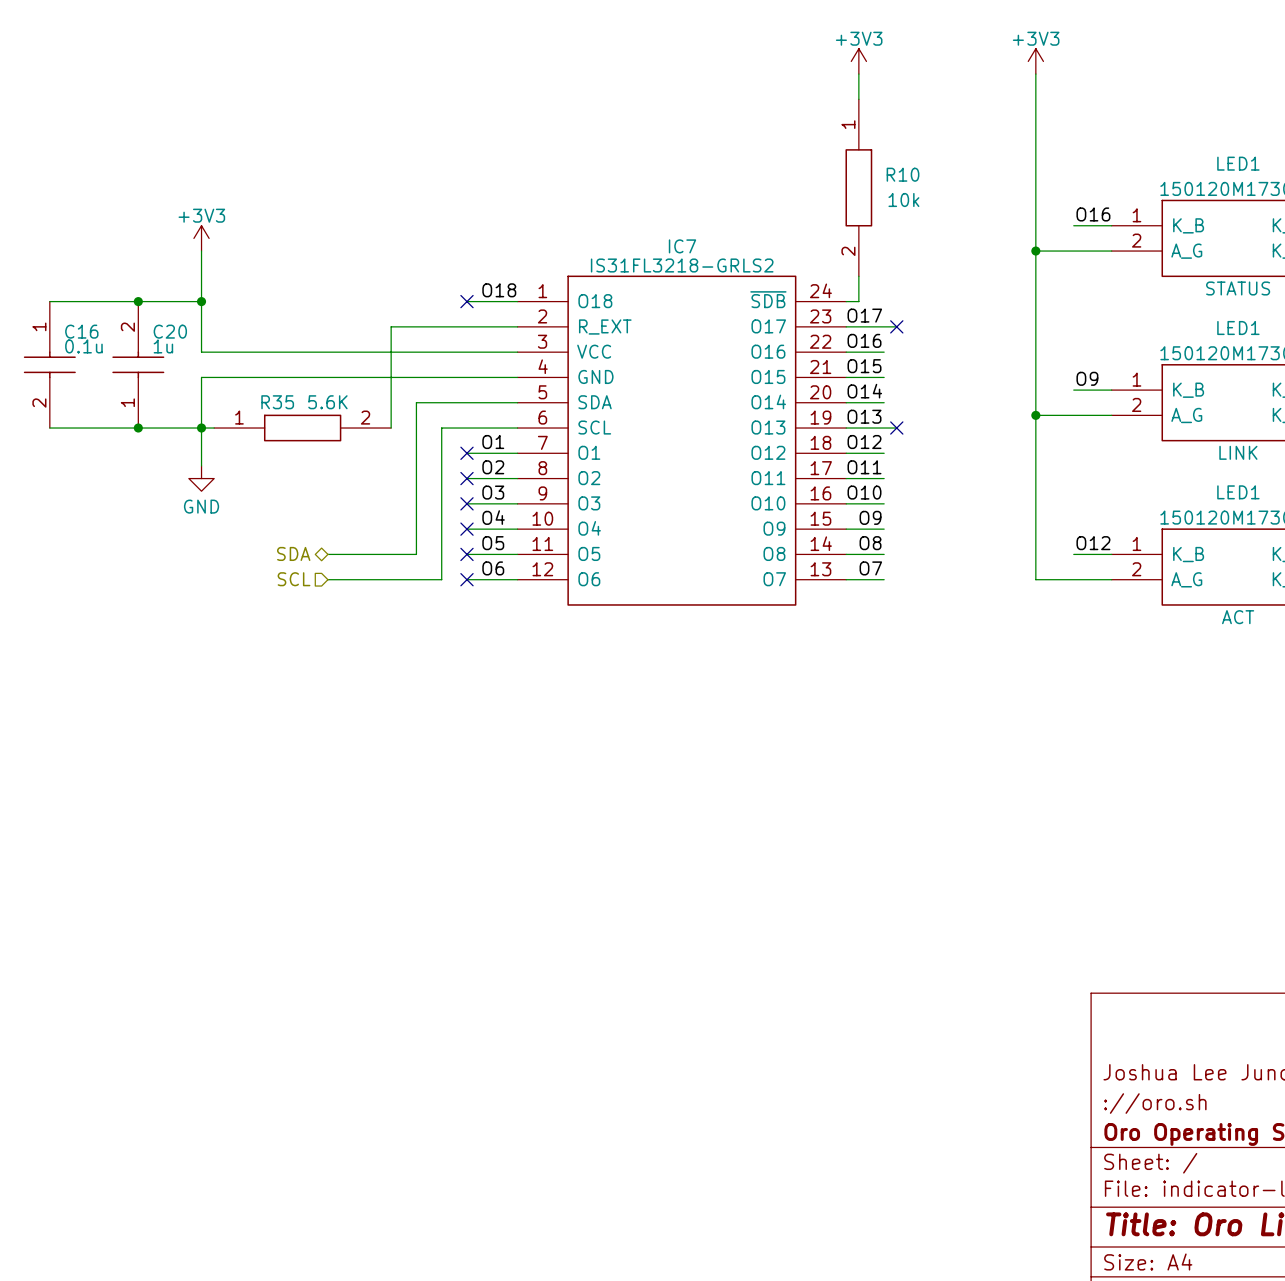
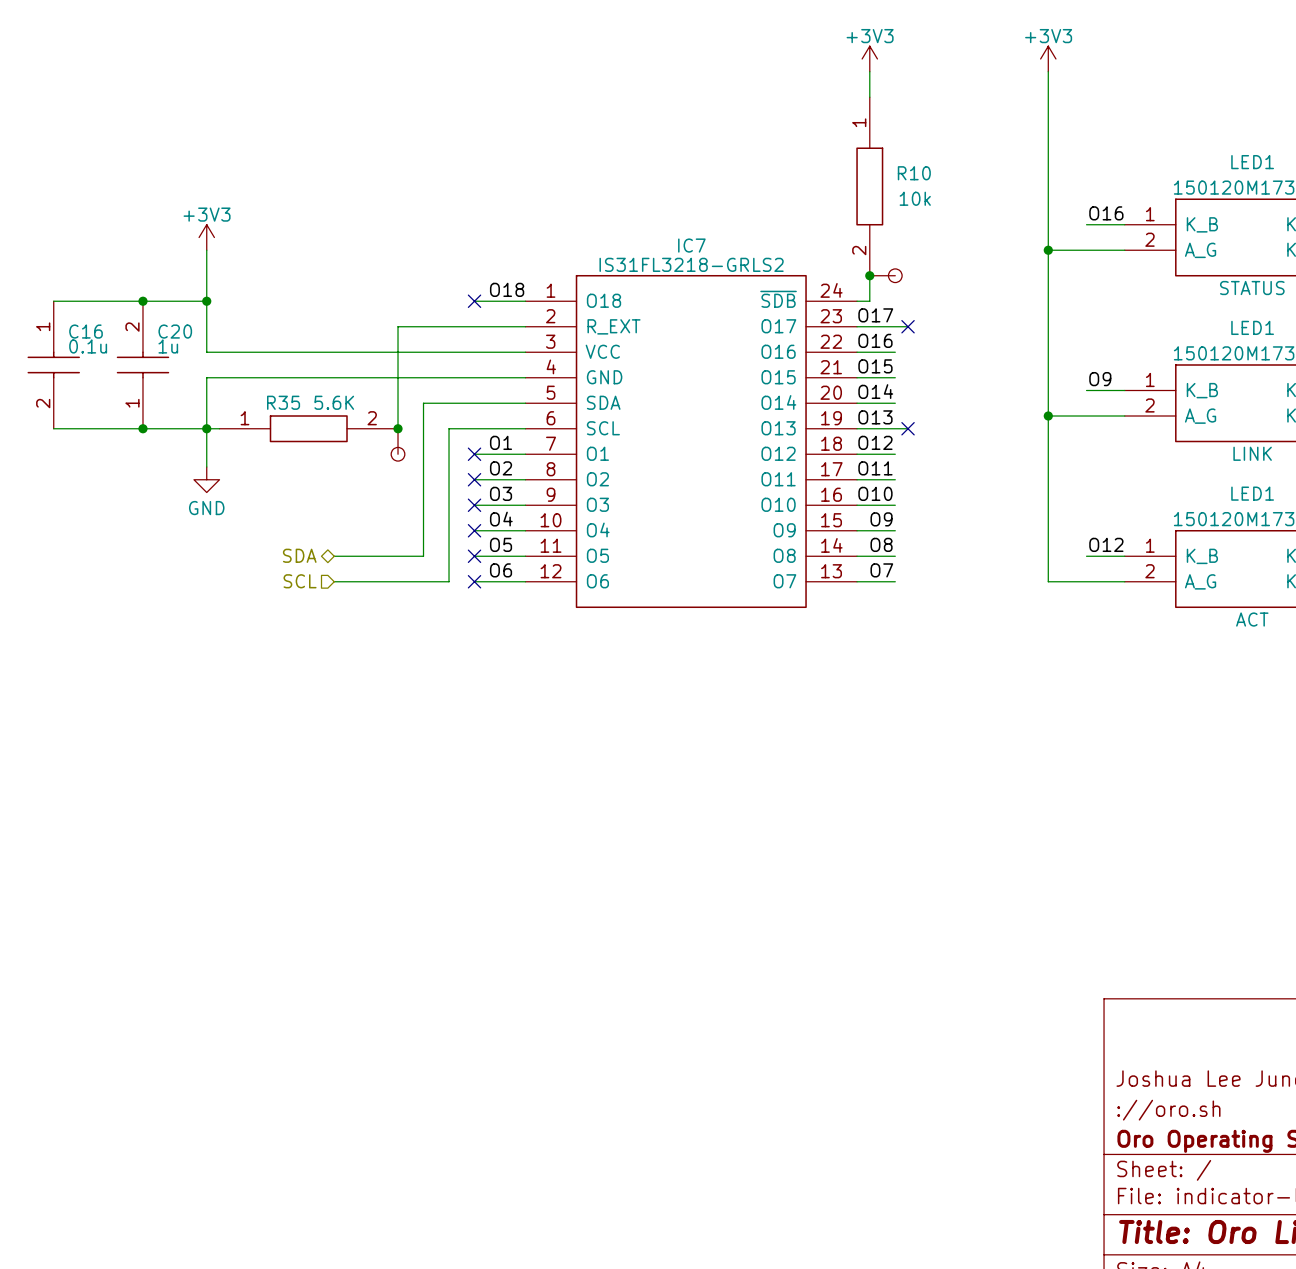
junction: none -> (869, 275)
part: none -> (885, 275)
junction: none -> (398, 428)
part: none -> (398, 444)

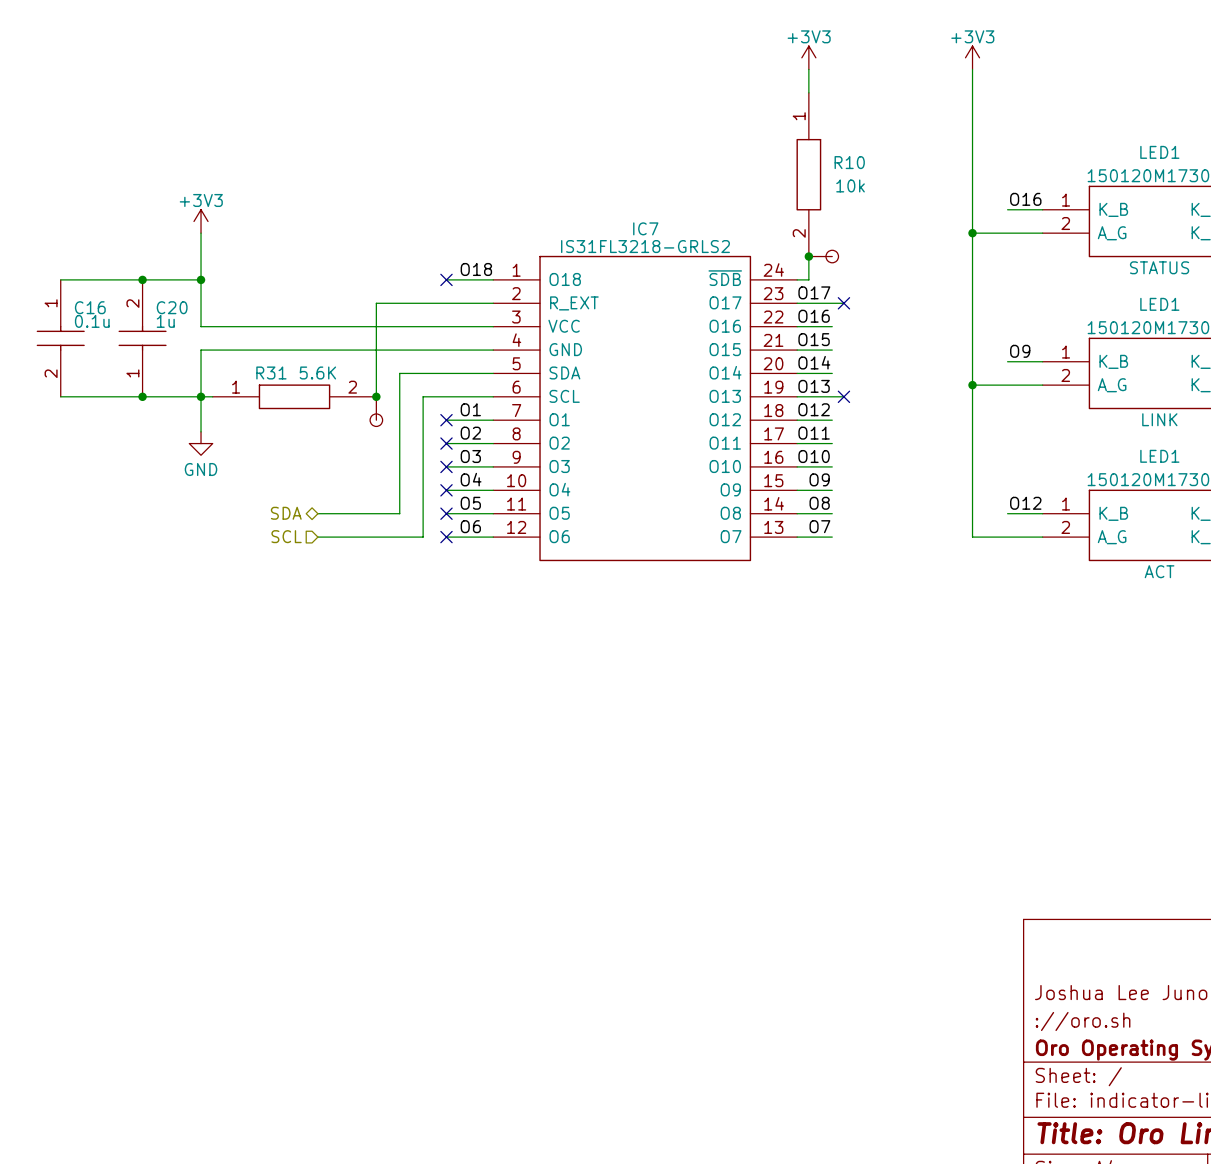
R35 name: R35 (283, 402) -> R31 (271, 372)

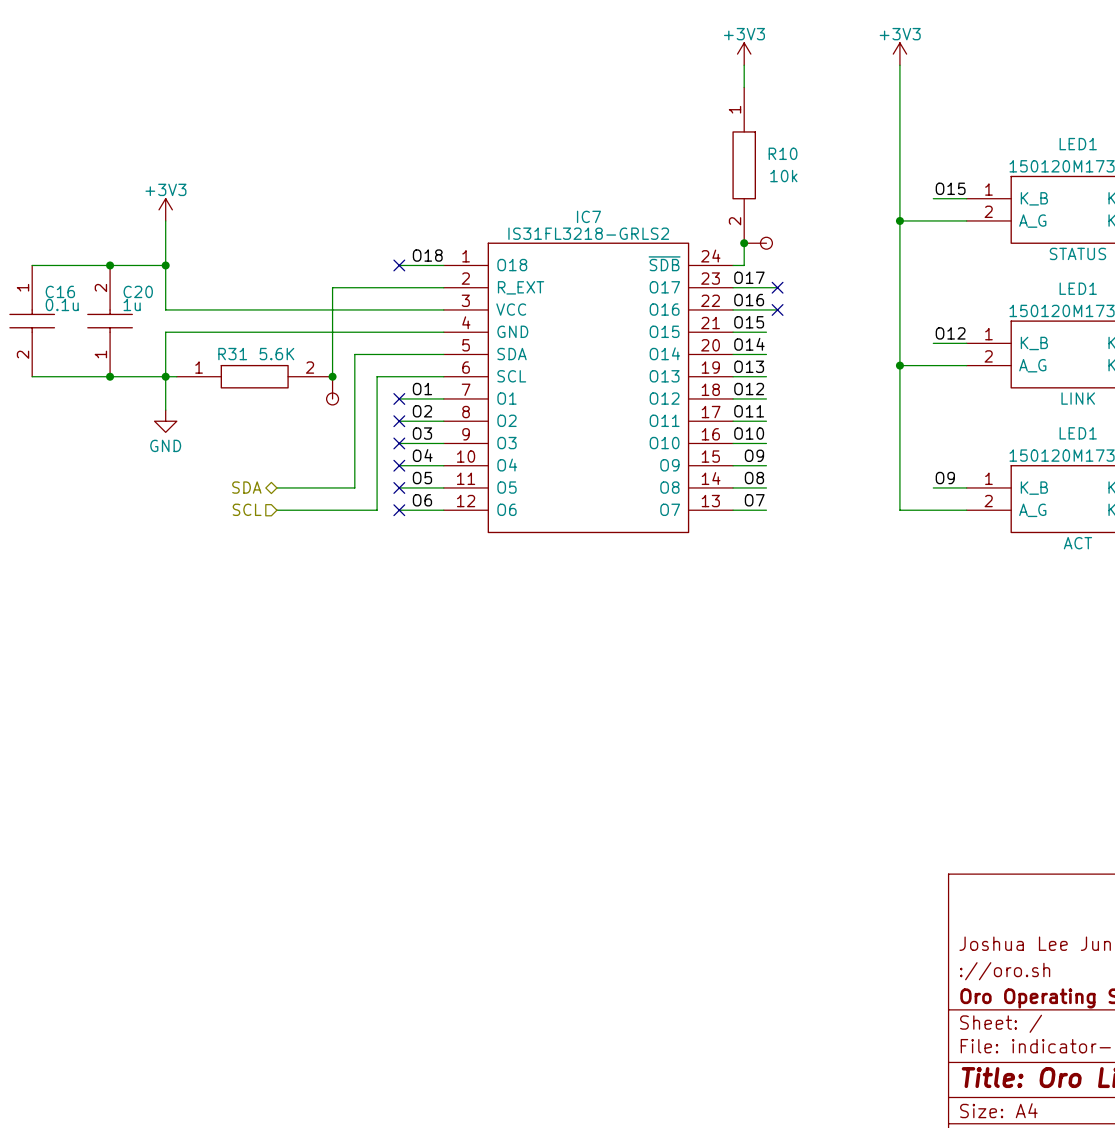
label: O16 (1025, 199) -> O15 (950, 188)
no-connect mark: none -> (777, 309)
label: O9 (1020, 351) -> O12 (950, 333)
wire: (832, 396) (843, 396) -> (766, 309) (777, 309)
no-connect mark: (843, 396) -> none
label: O12 (1025, 503) -> O9 (945, 478)

